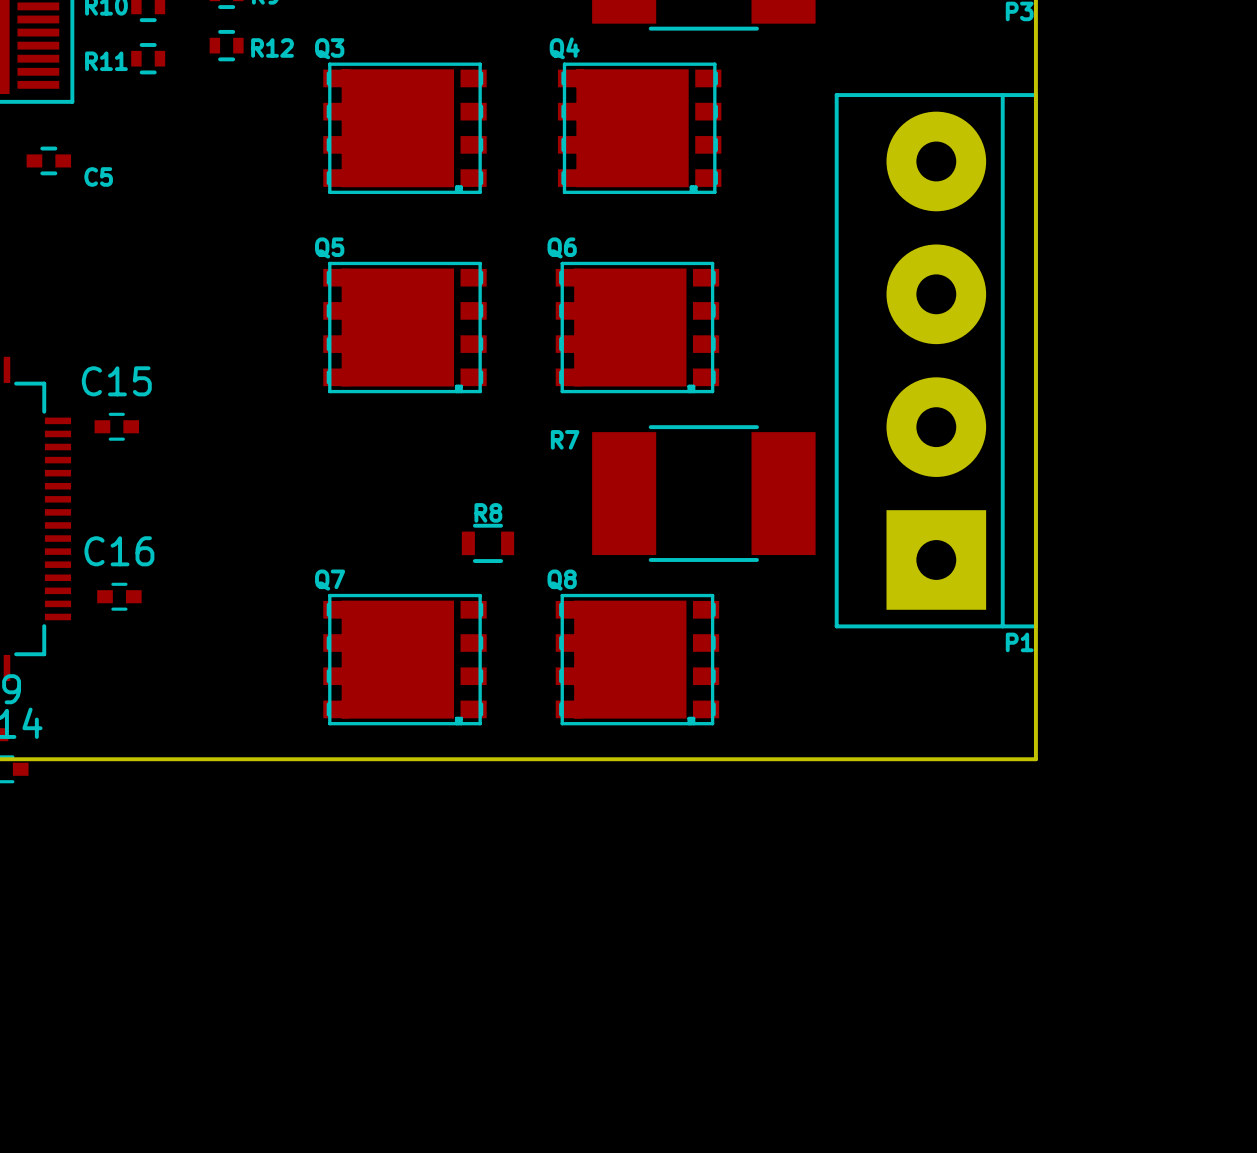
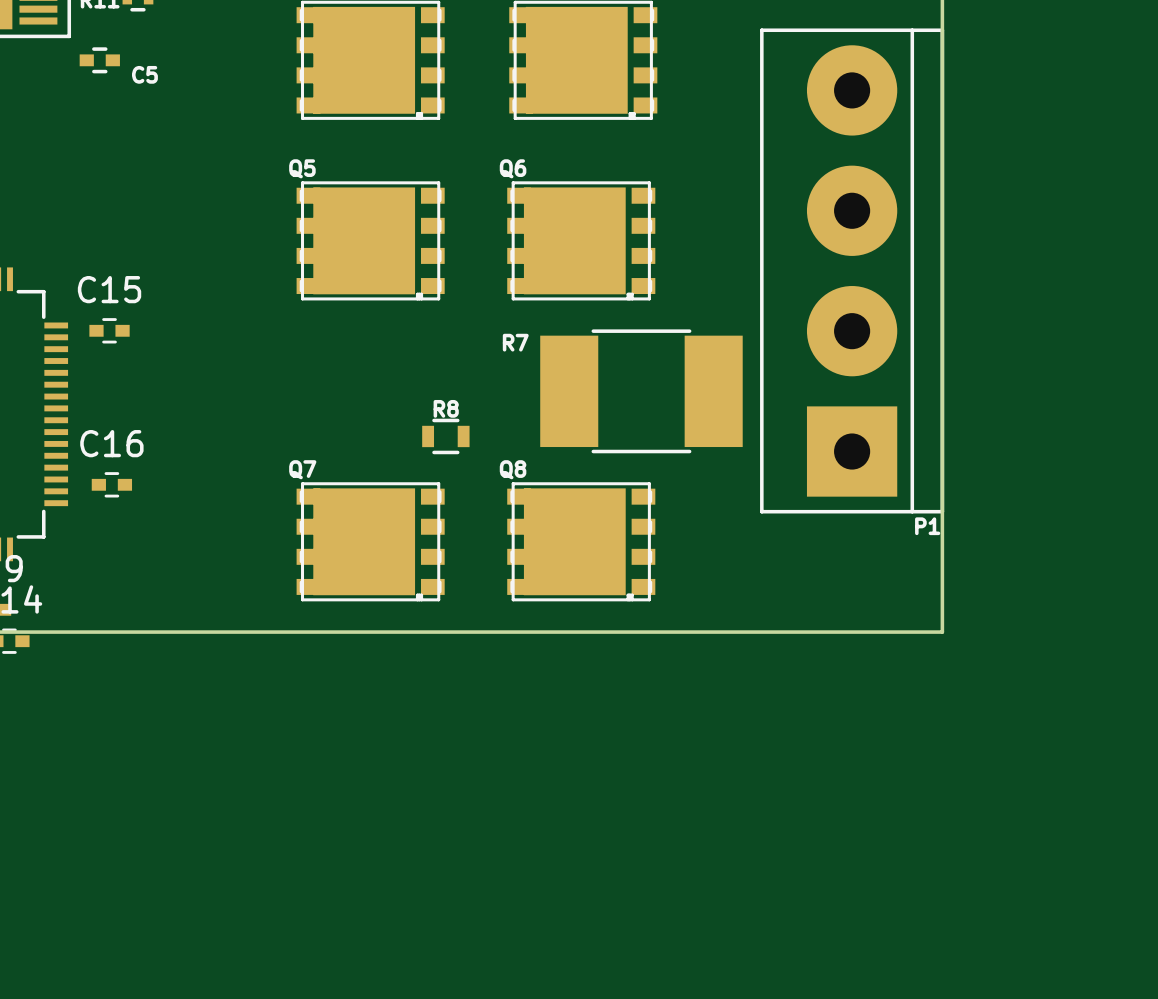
C5 position: (48, 160) -> (99, 60)

